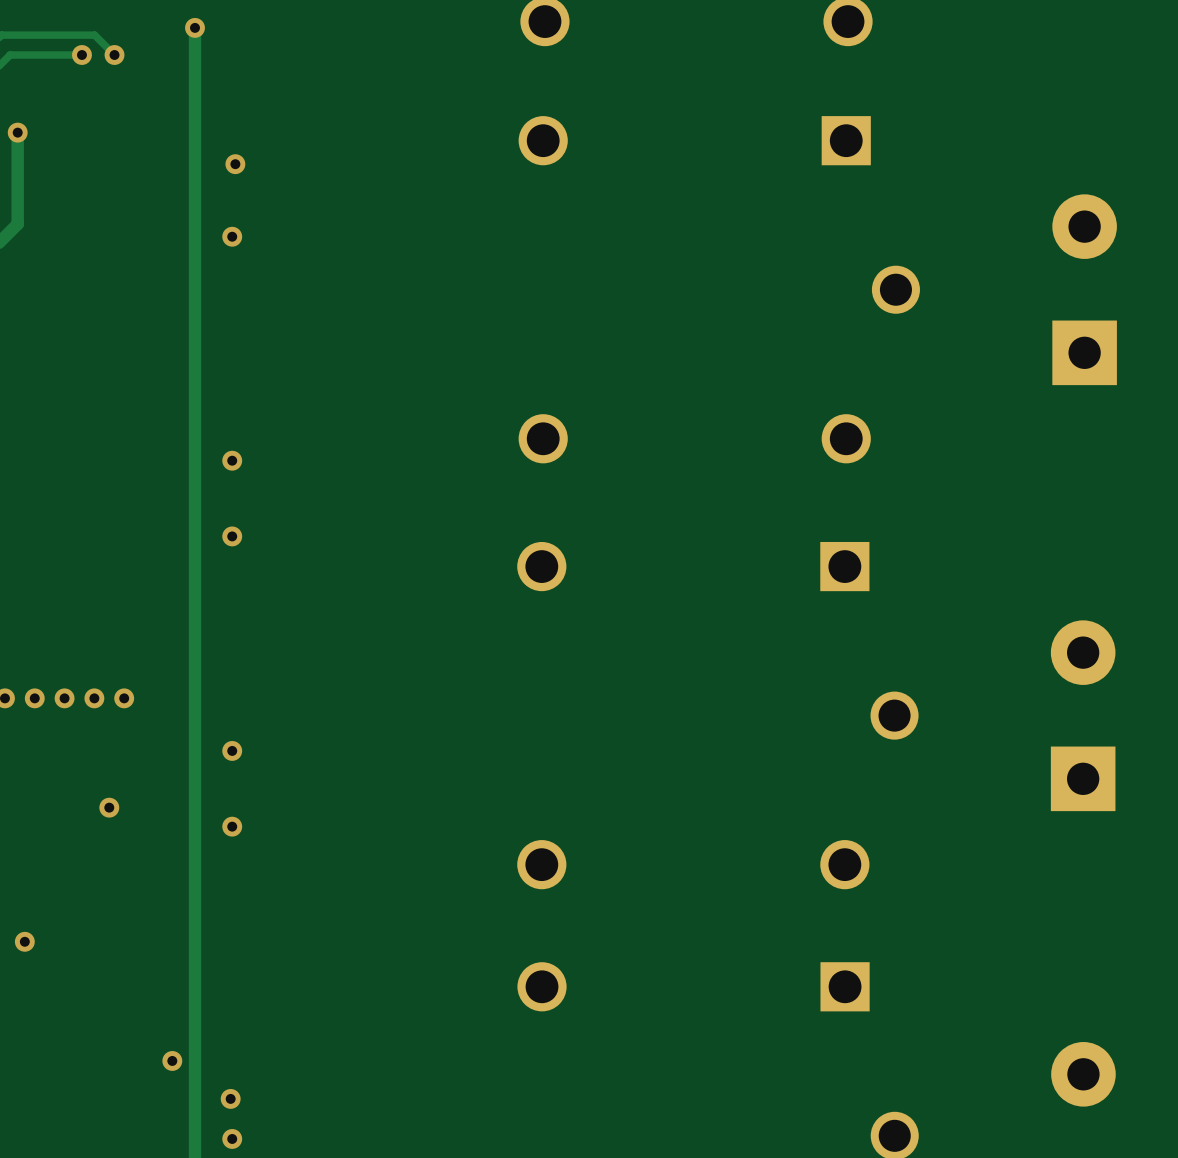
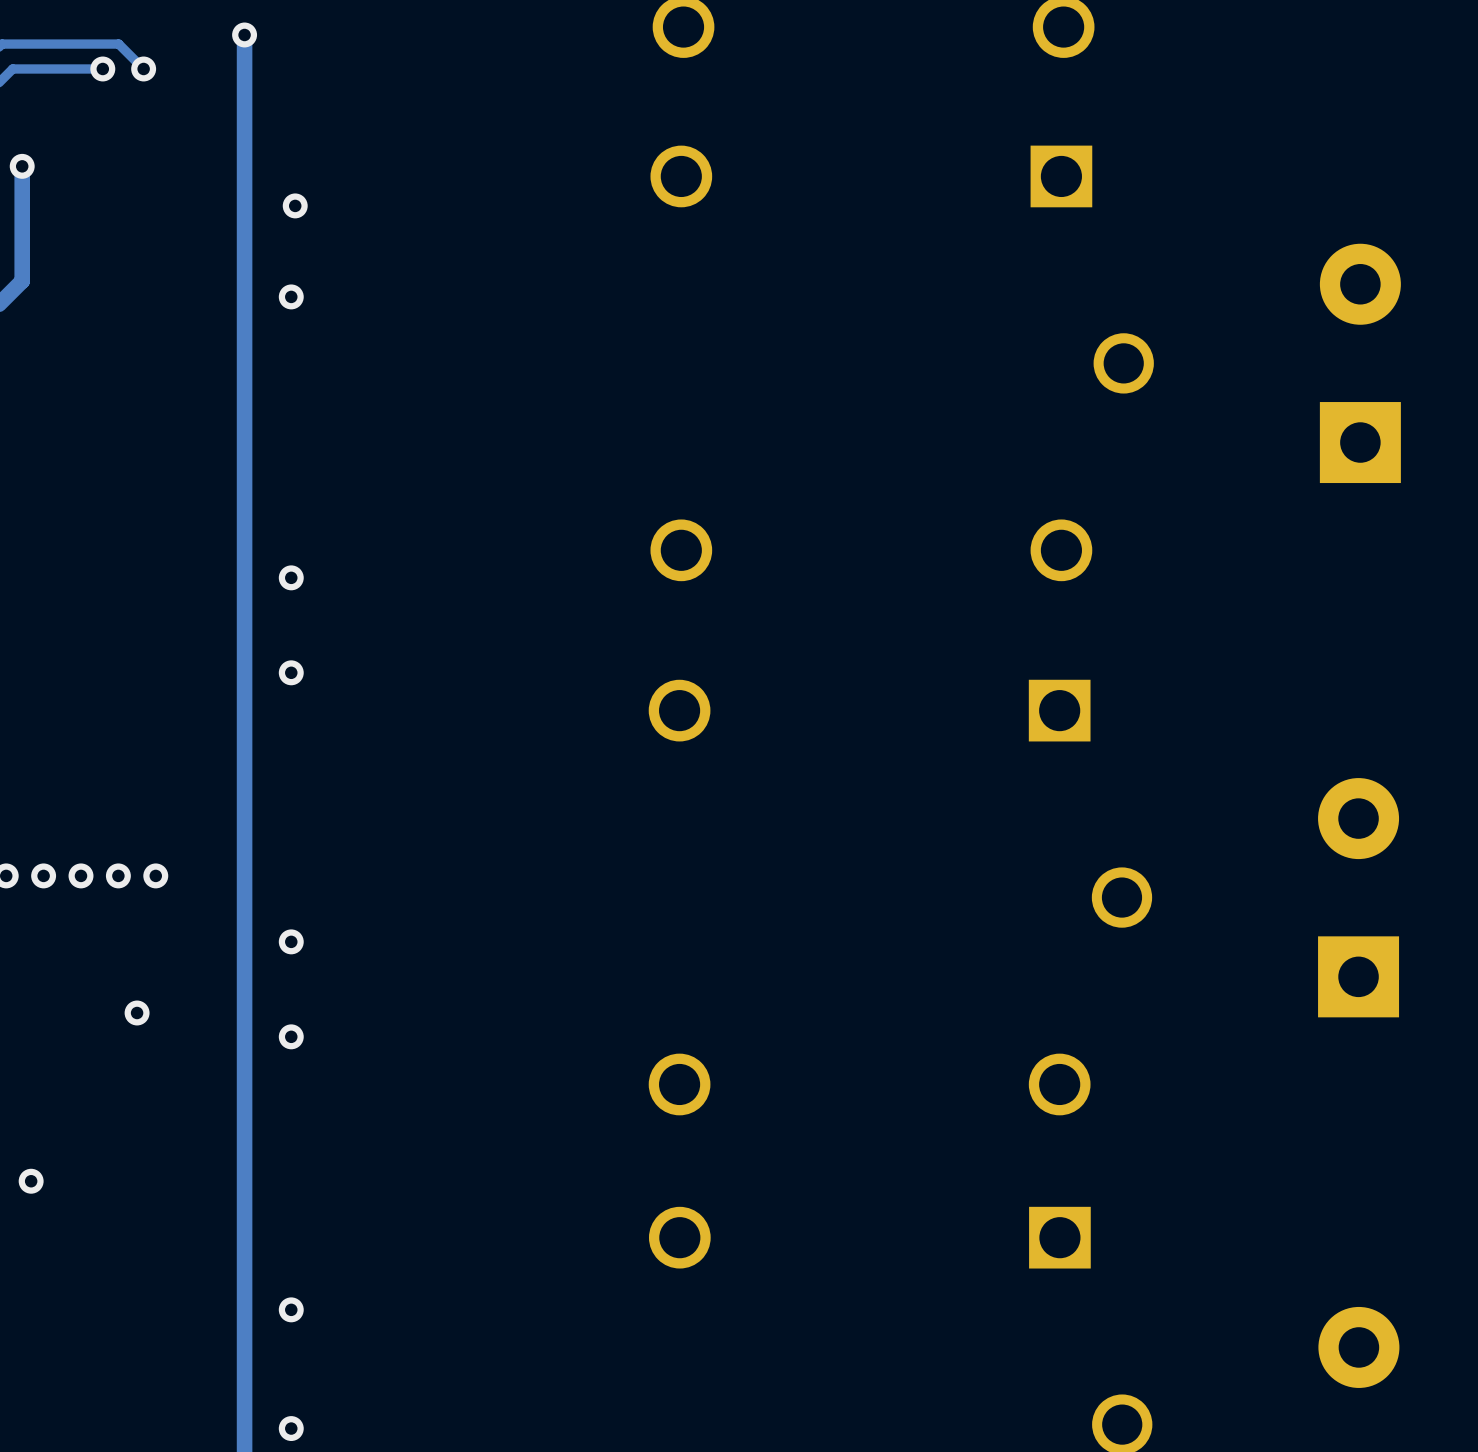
via: none -> (291, 1309)
via: (172, 1060) -> none
via: (230, 1098) -> none

